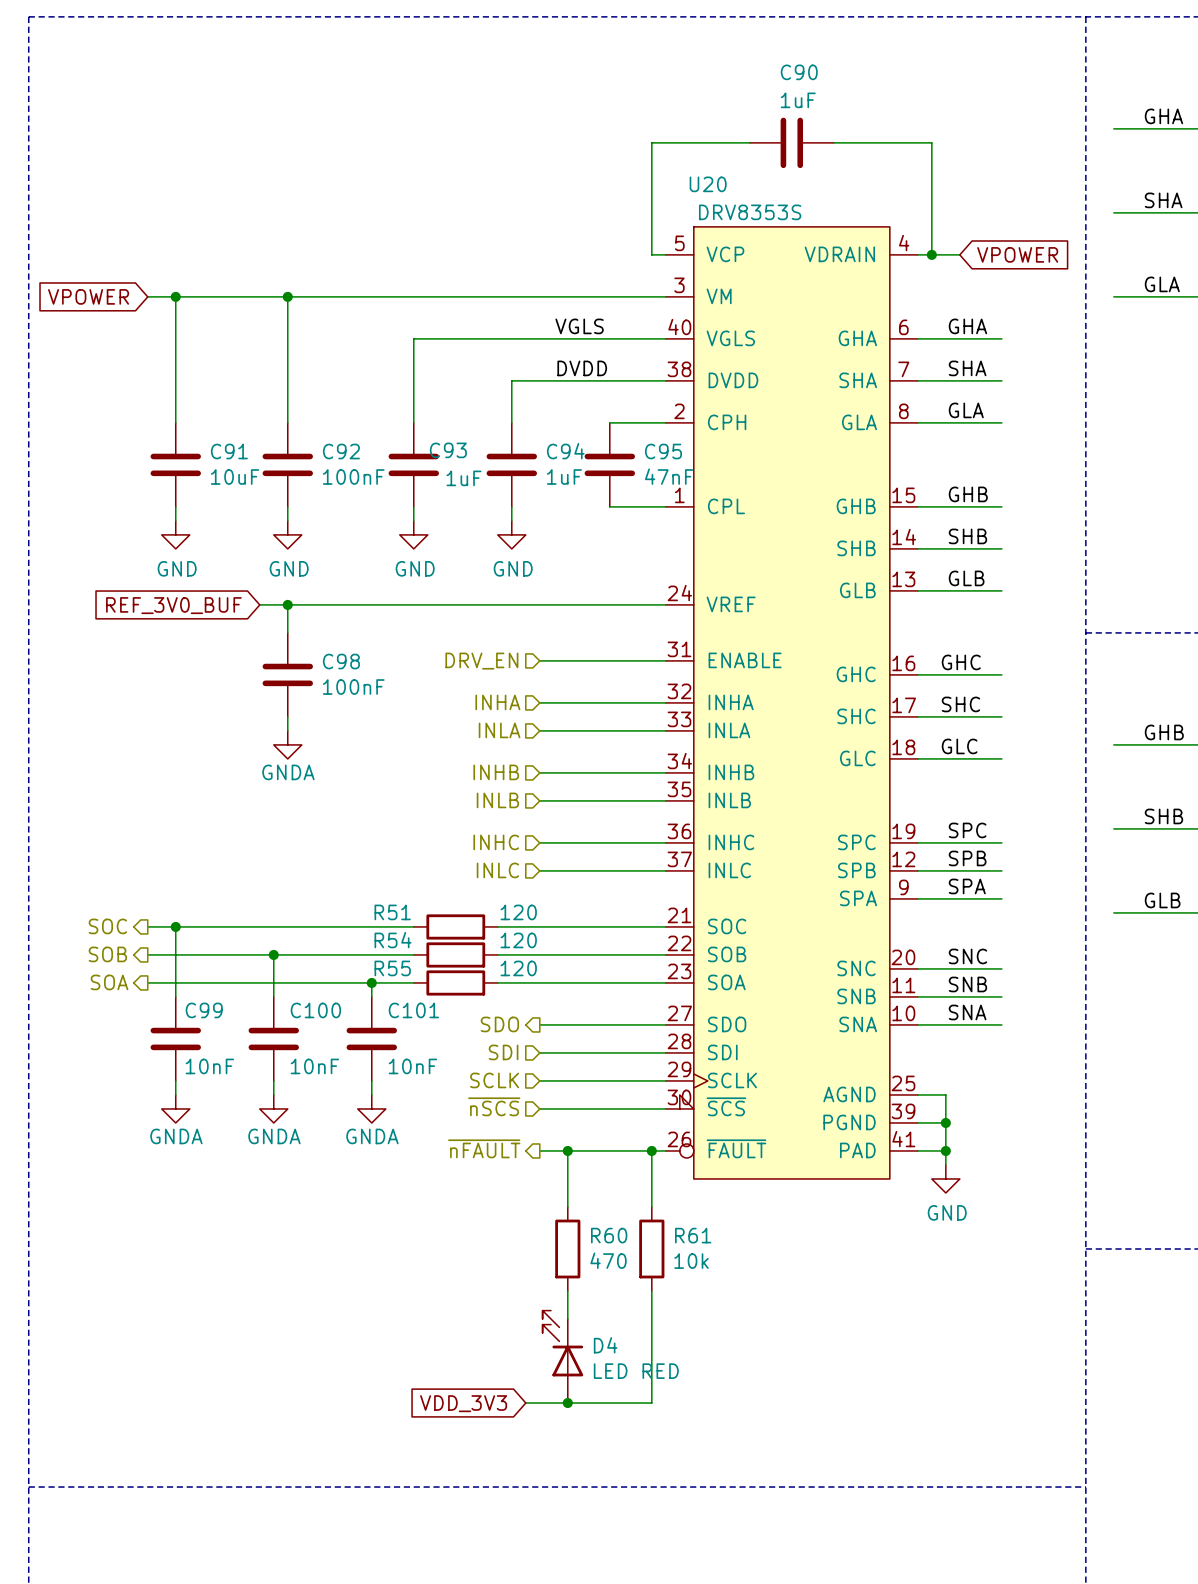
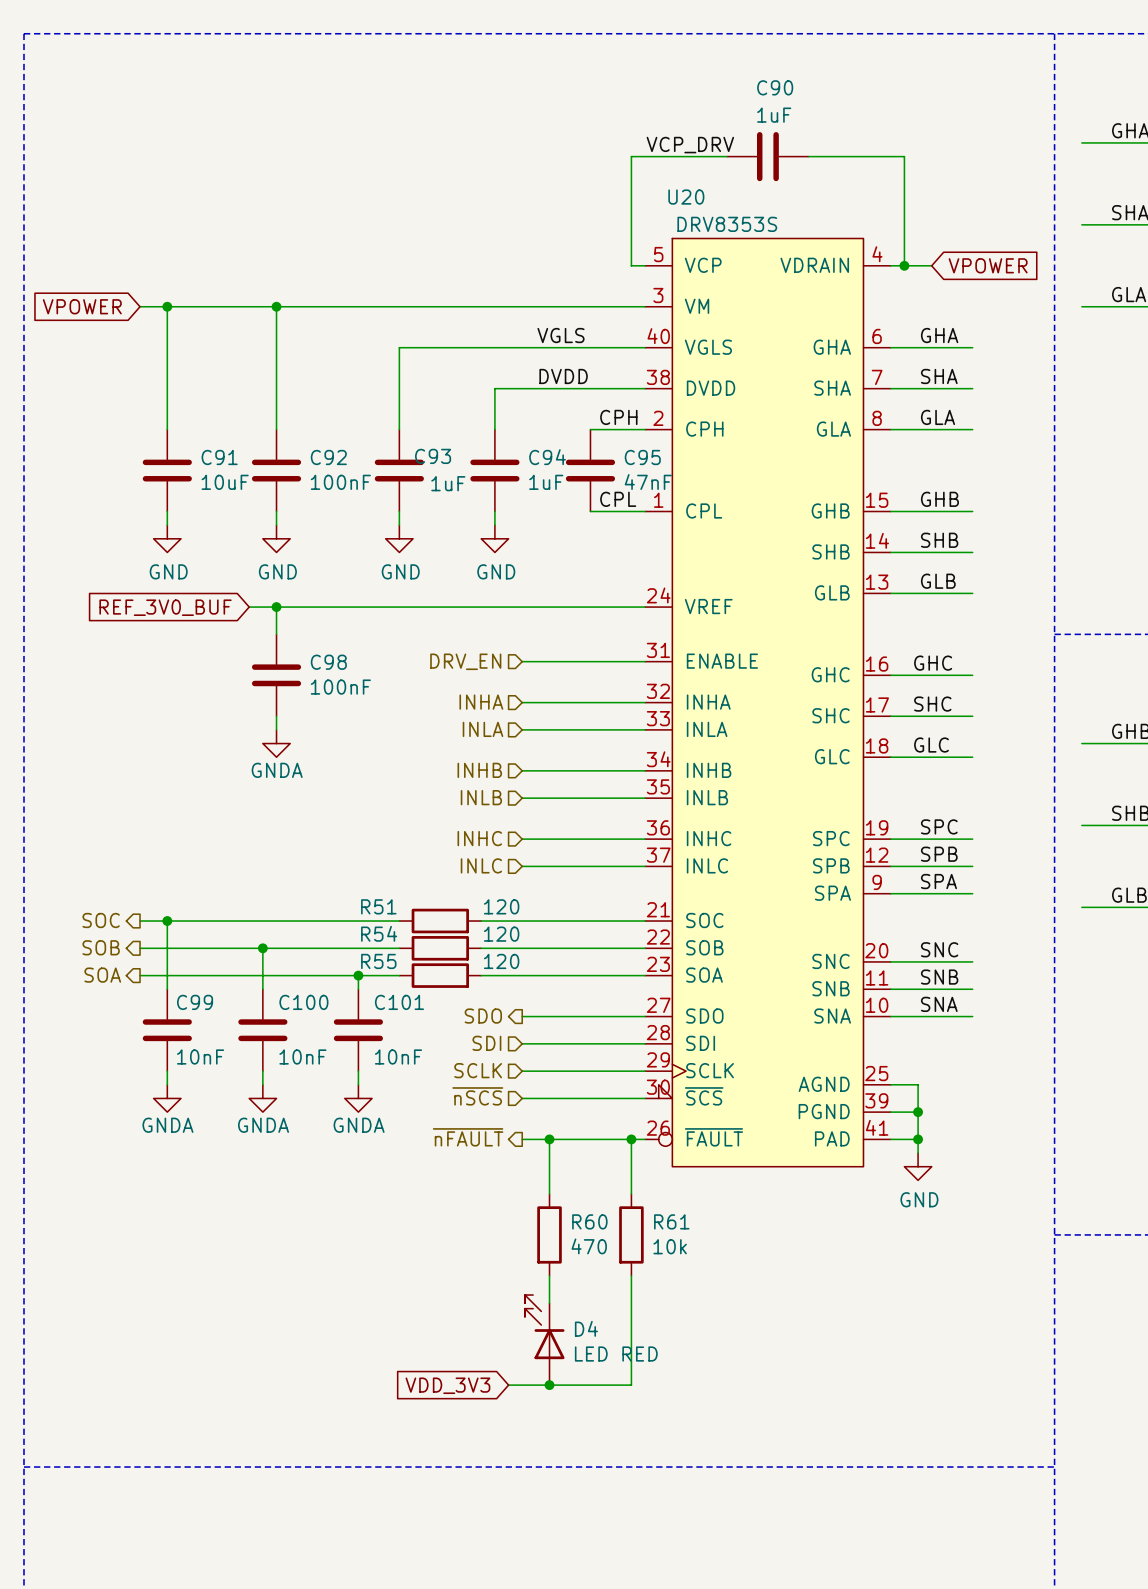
label: none -> VCP_DRV (690, 145)
label: none -> CPH (618, 417)
label: none -> CPL (618, 499)

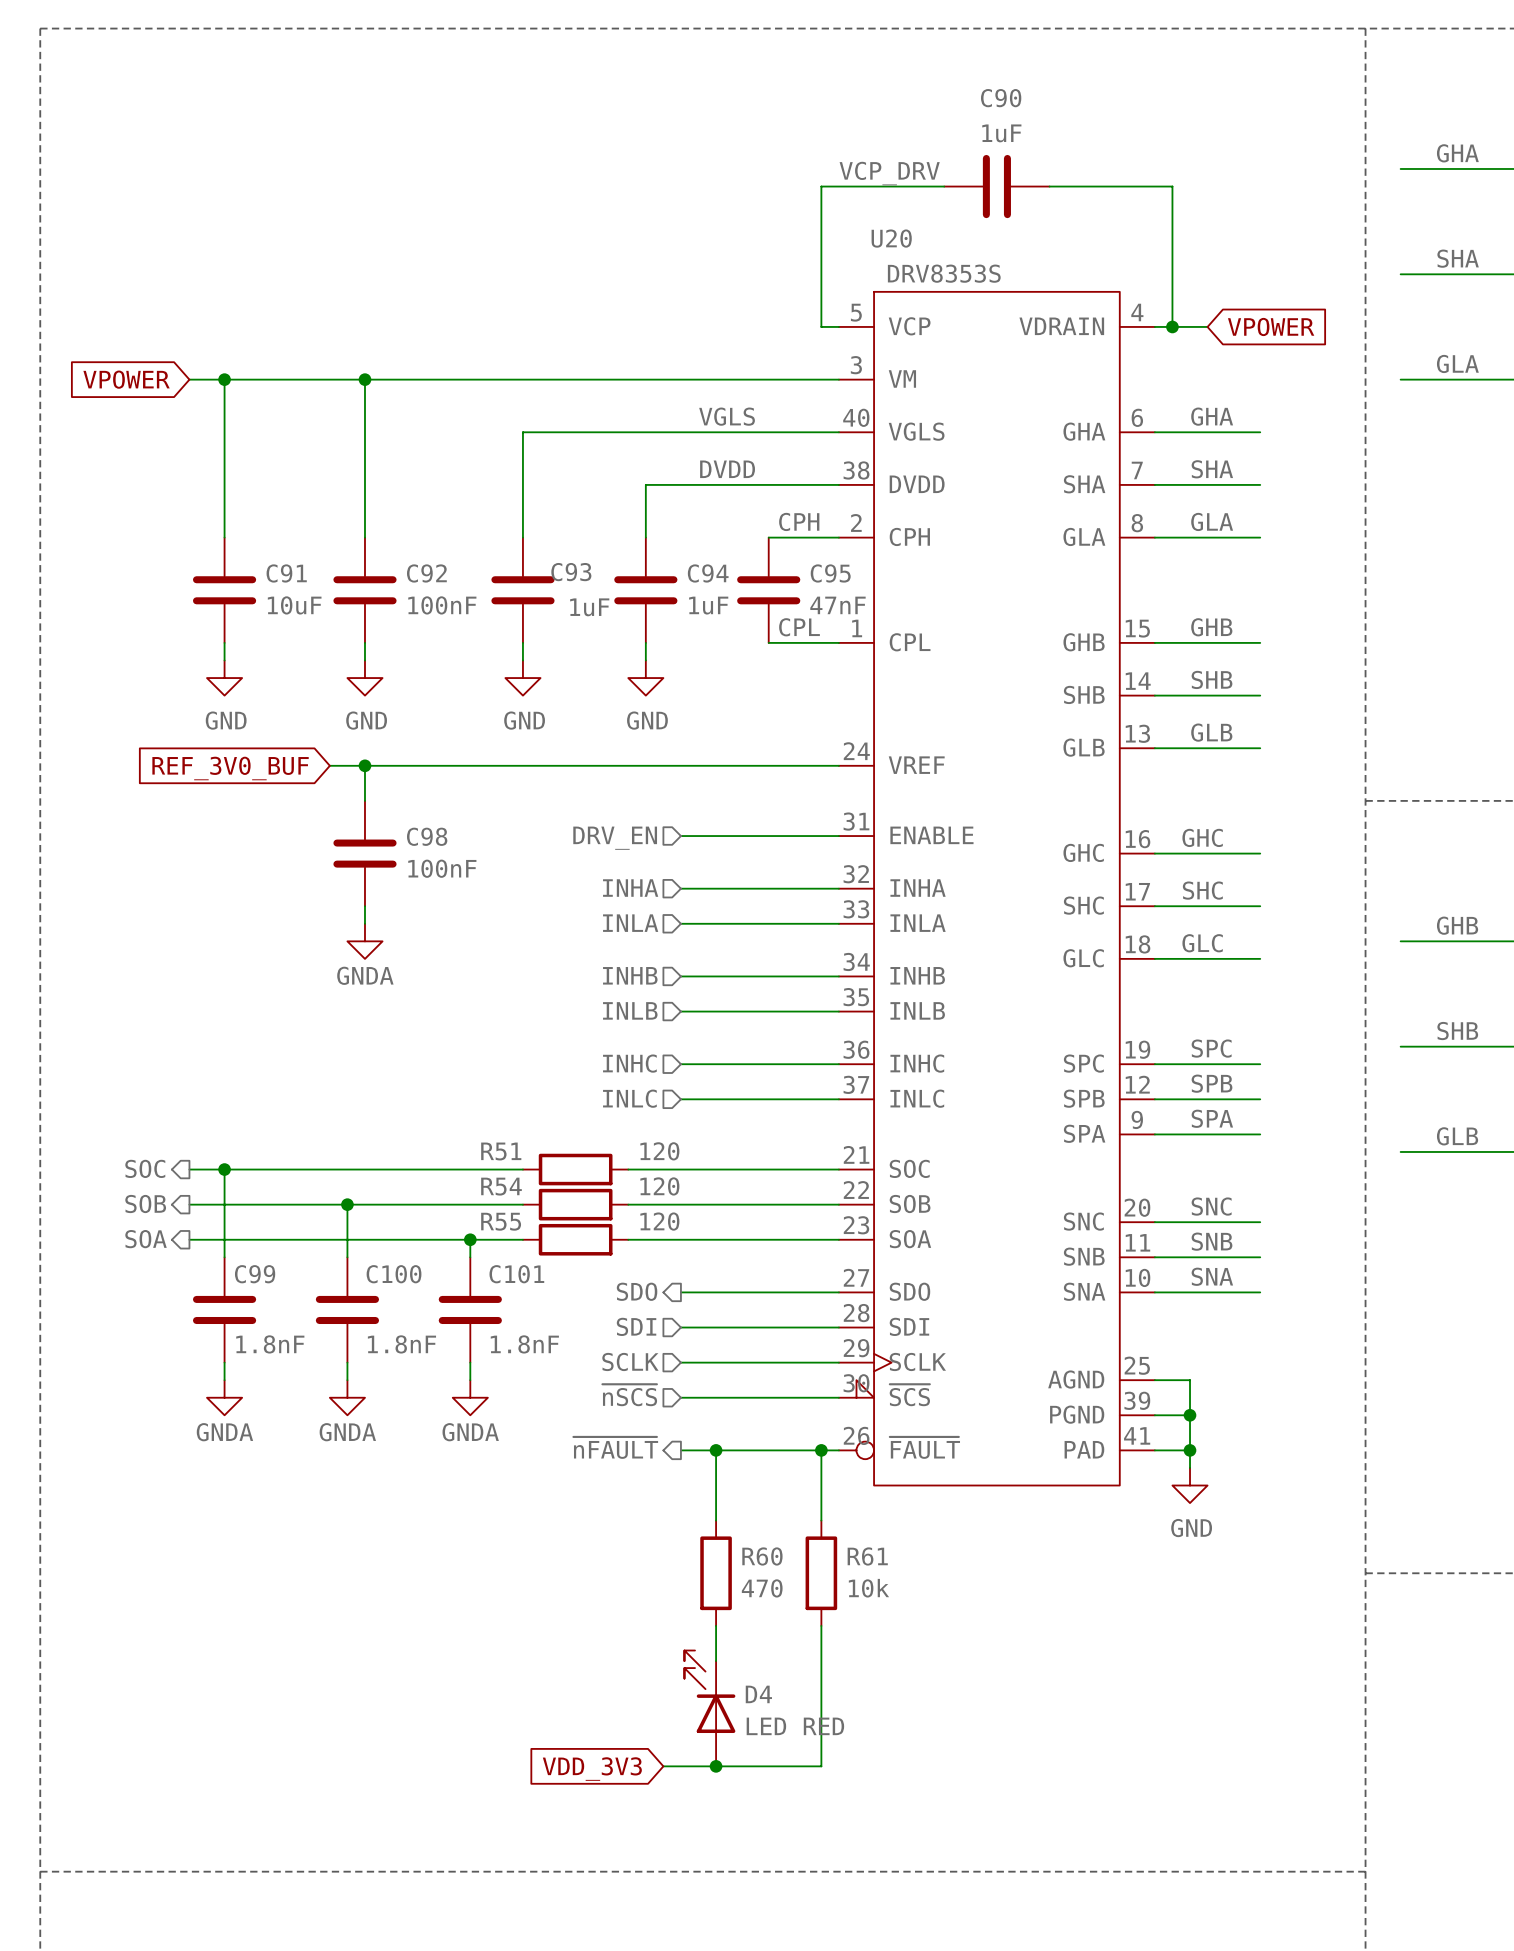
C99 value: 10nF (200, 1057) -> 1.8nF (270, 1344)
C100 value: 10nF (302, 1057) -> 1.8nF (401, 1344)
C101 value: 10nF (398, 1057) -> 1.8nF (524, 1344)

